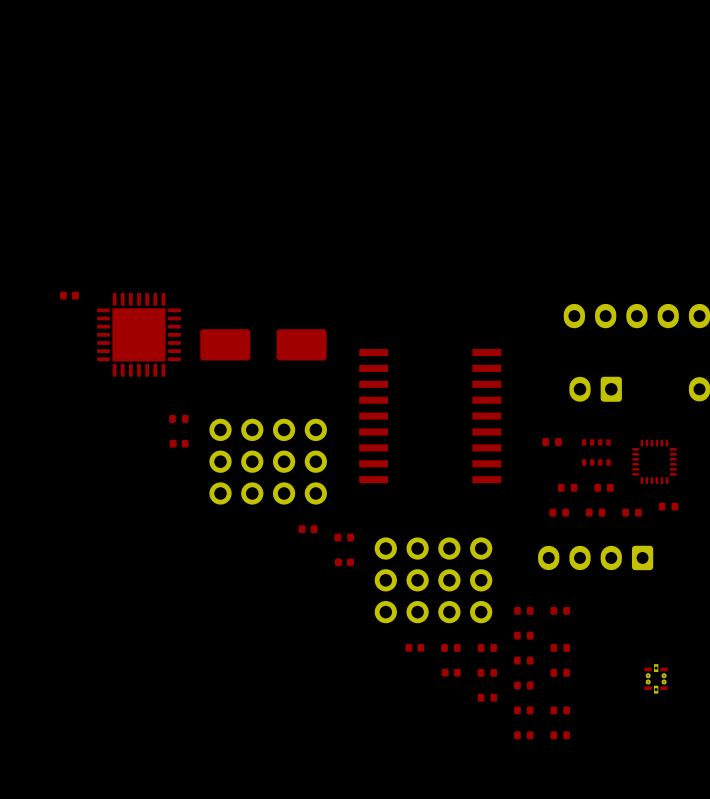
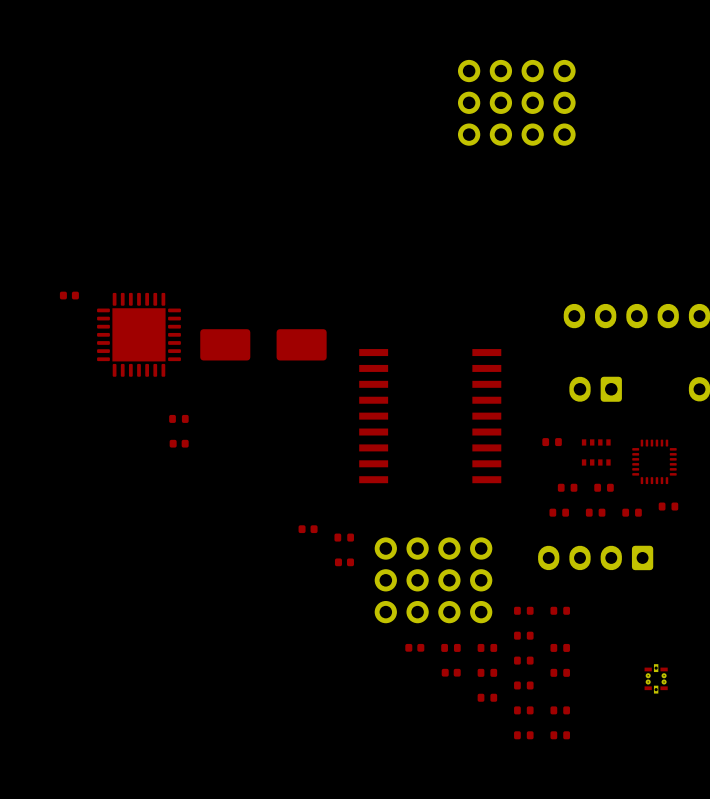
part: none -> (516, 102)
part: (268, 461) -> none

